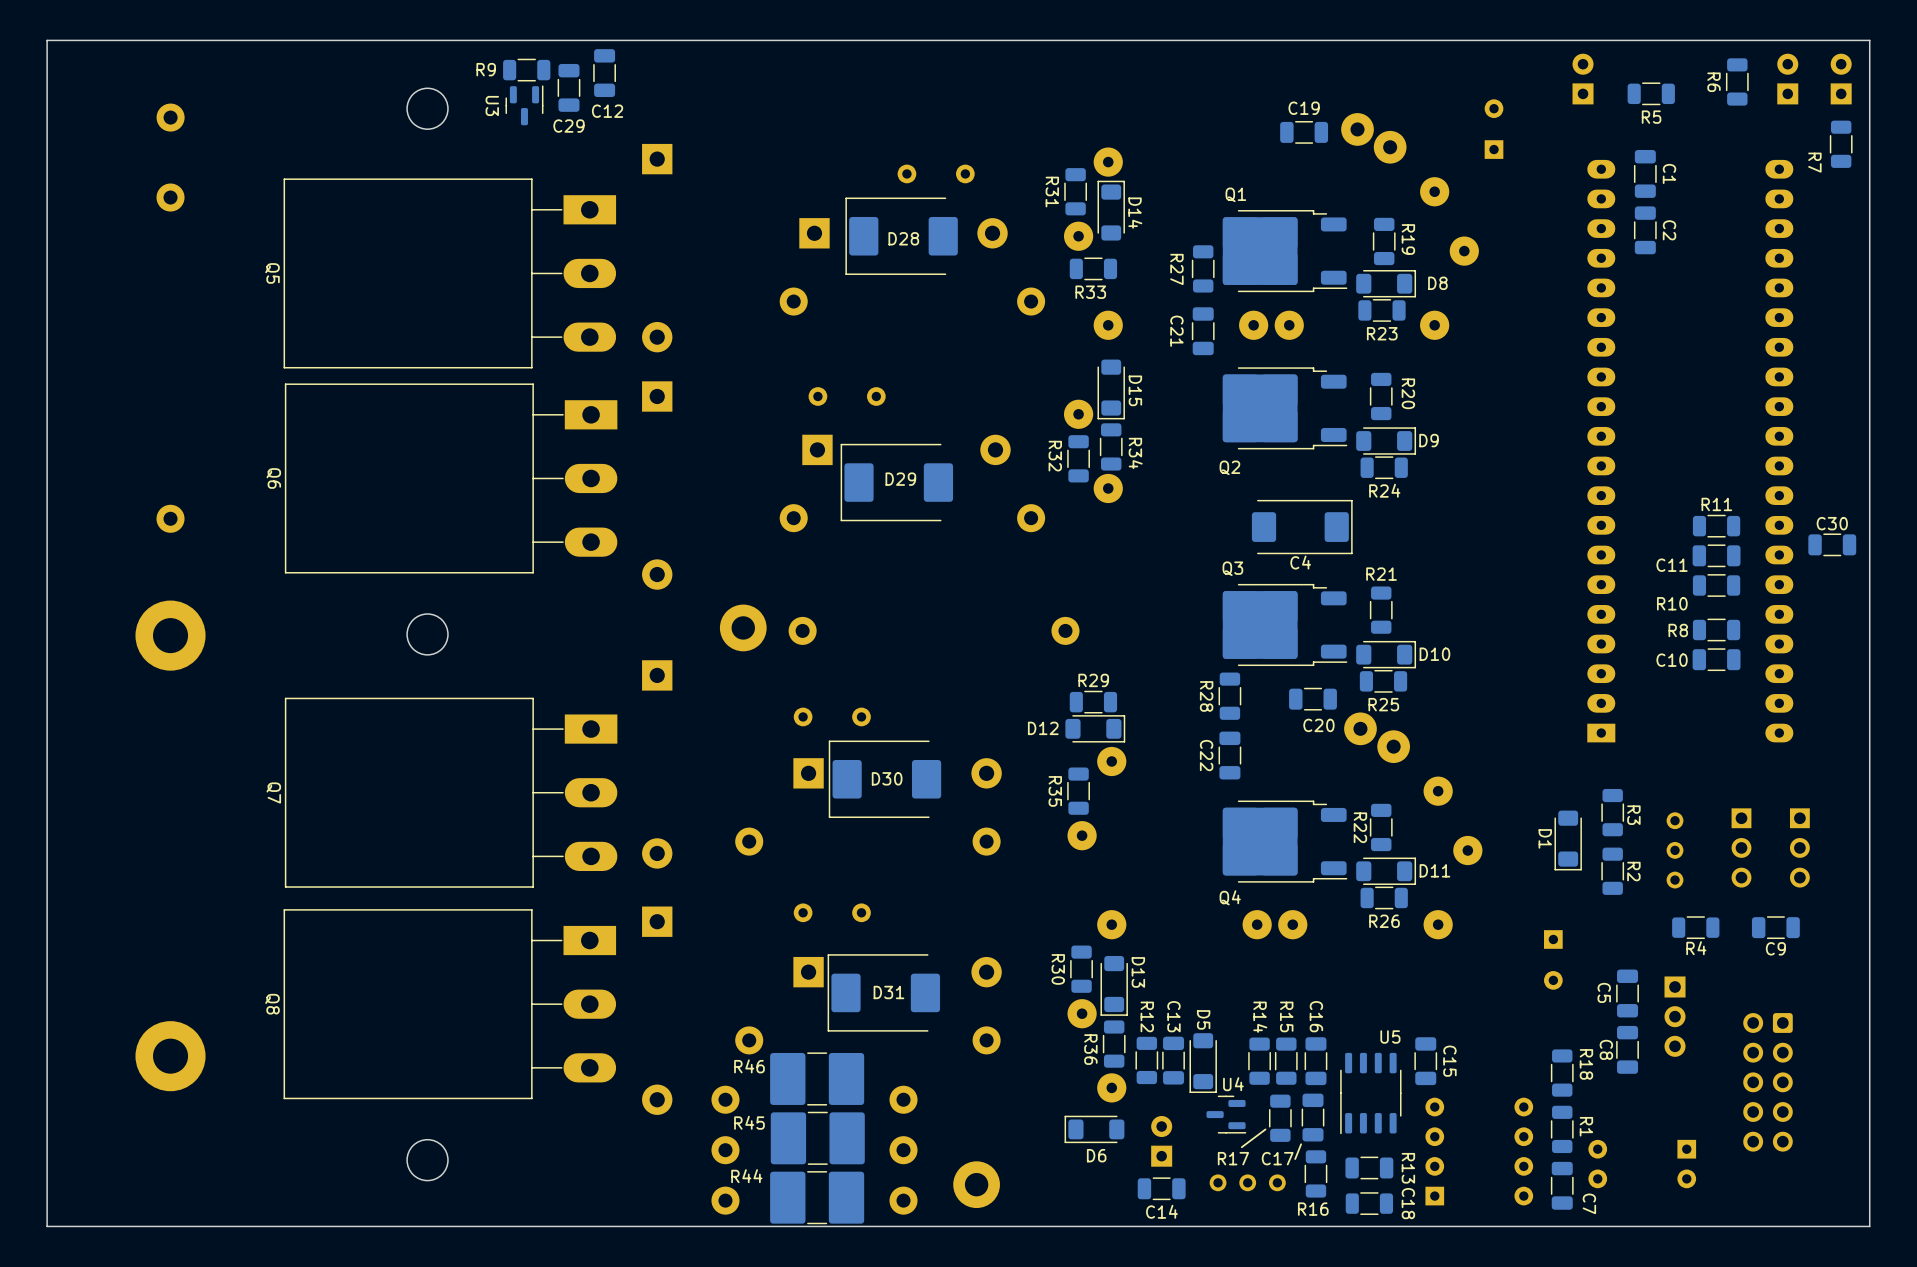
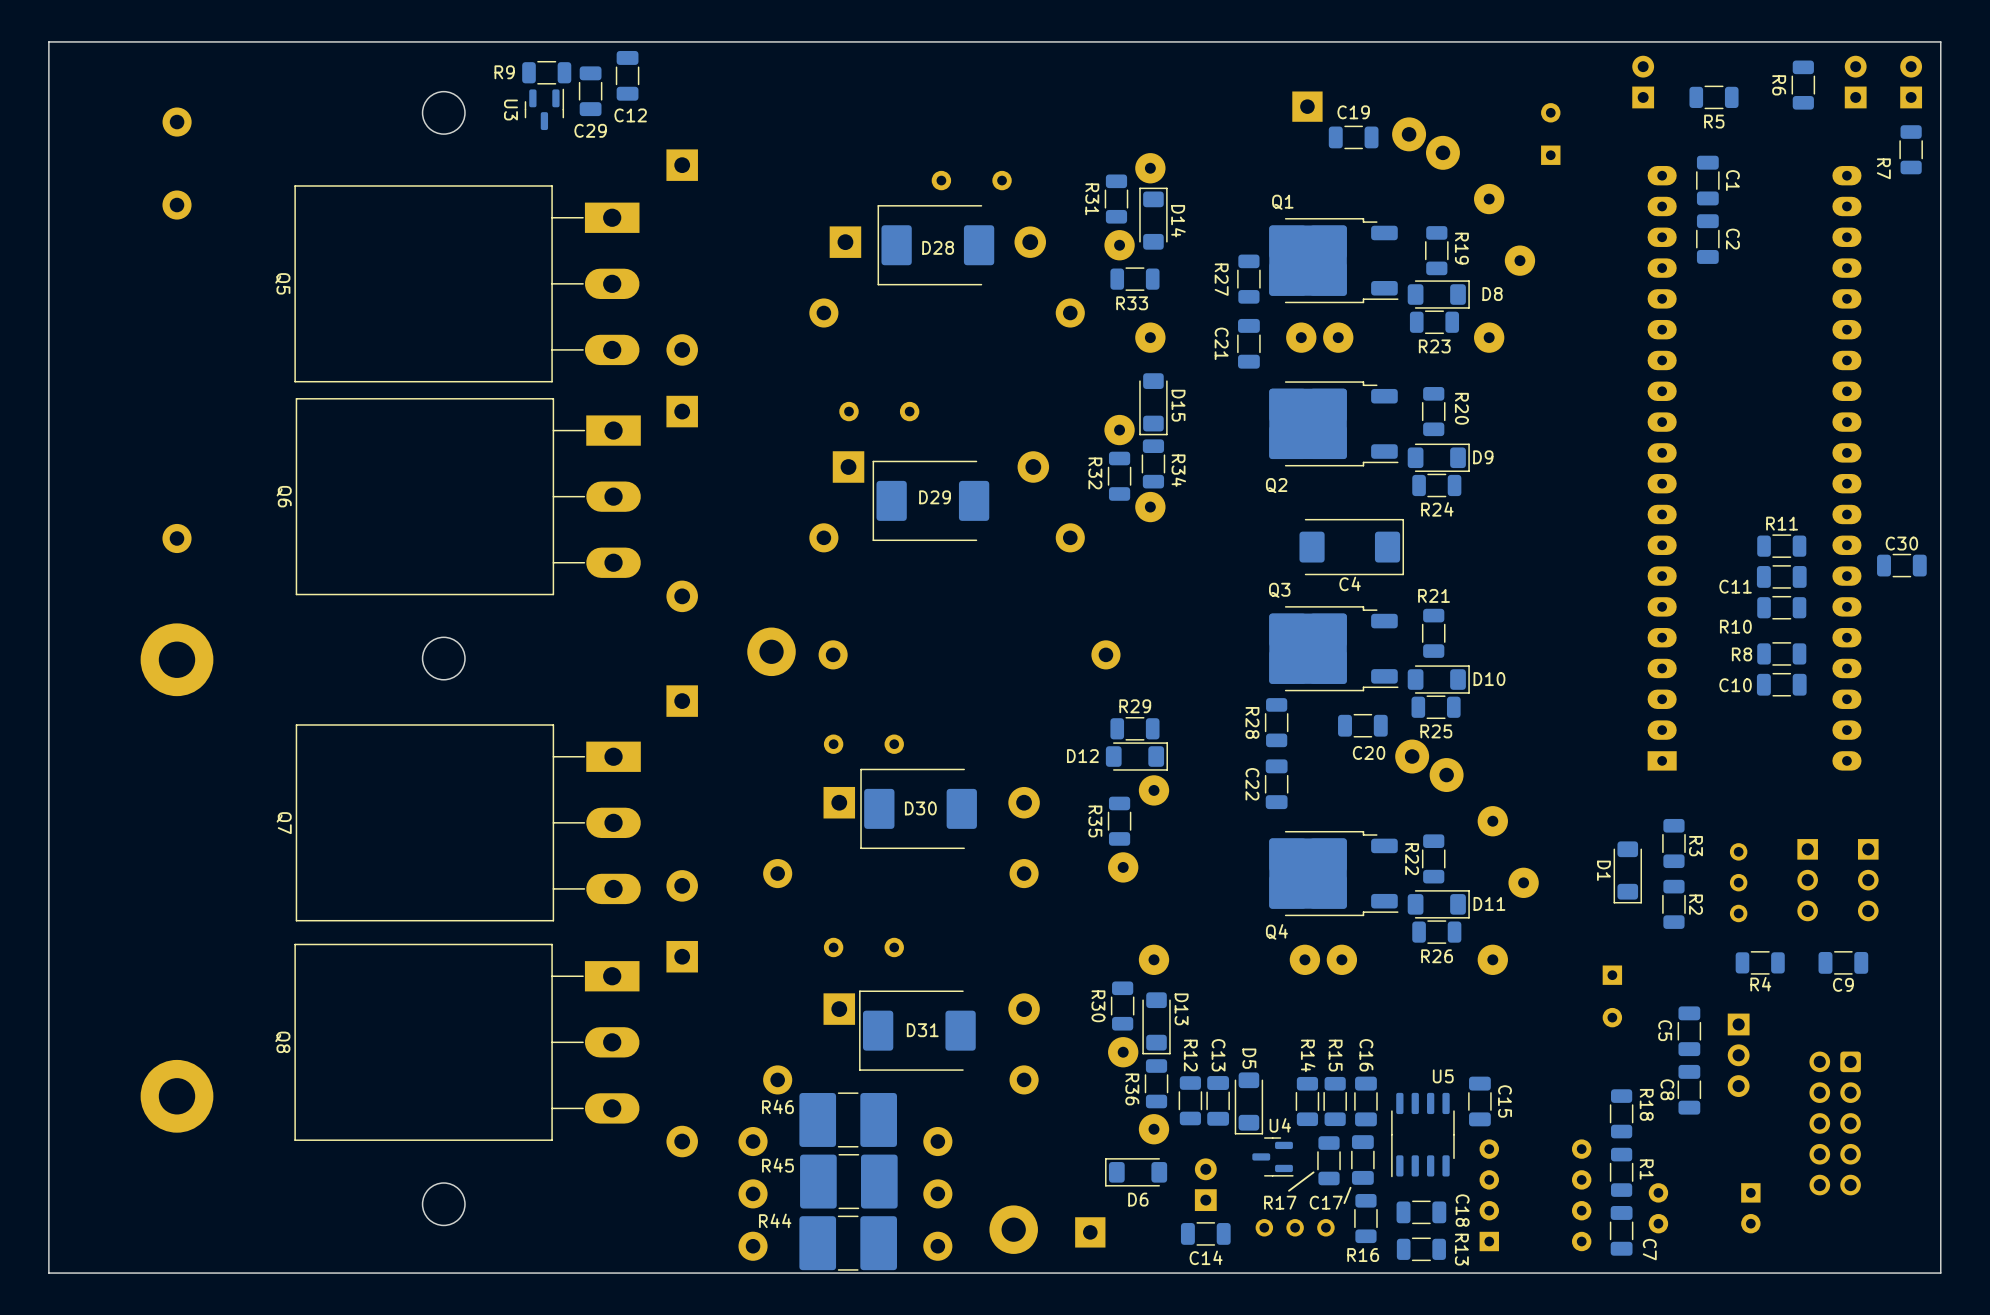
part: none -> (1307, 106)
R13 name position: R13 (1408, 1168) -> R13 (1461, 1249)
part: none -> (1090, 1232)
C18 name position: C18 (1408, 1203) -> C18 (1462, 1210)

